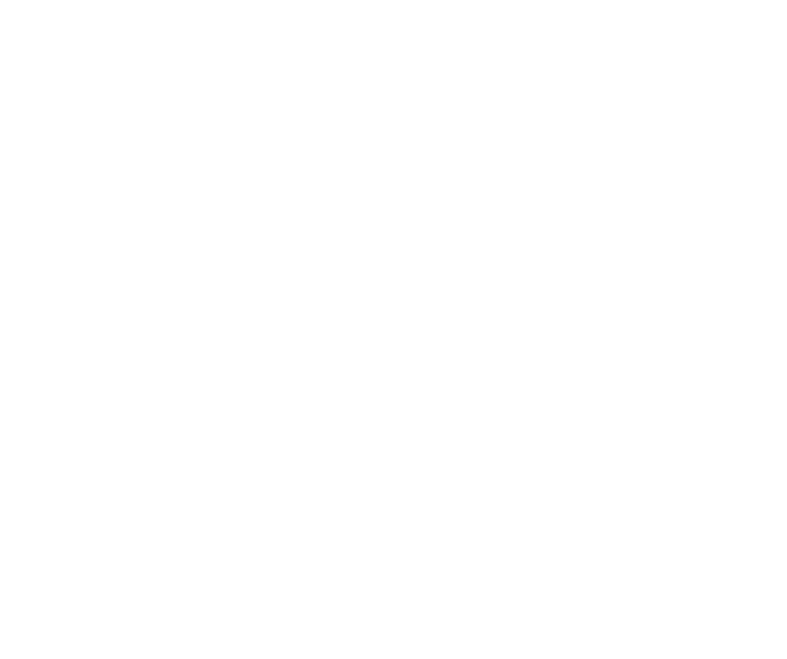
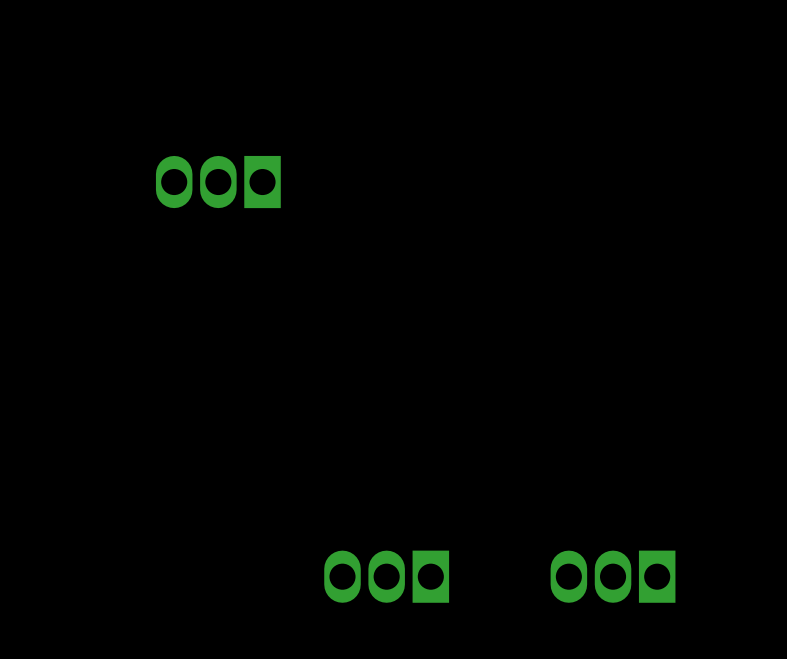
part: none -> (218, 182)
part: none -> (386, 576)
part: none -> (613, 576)

